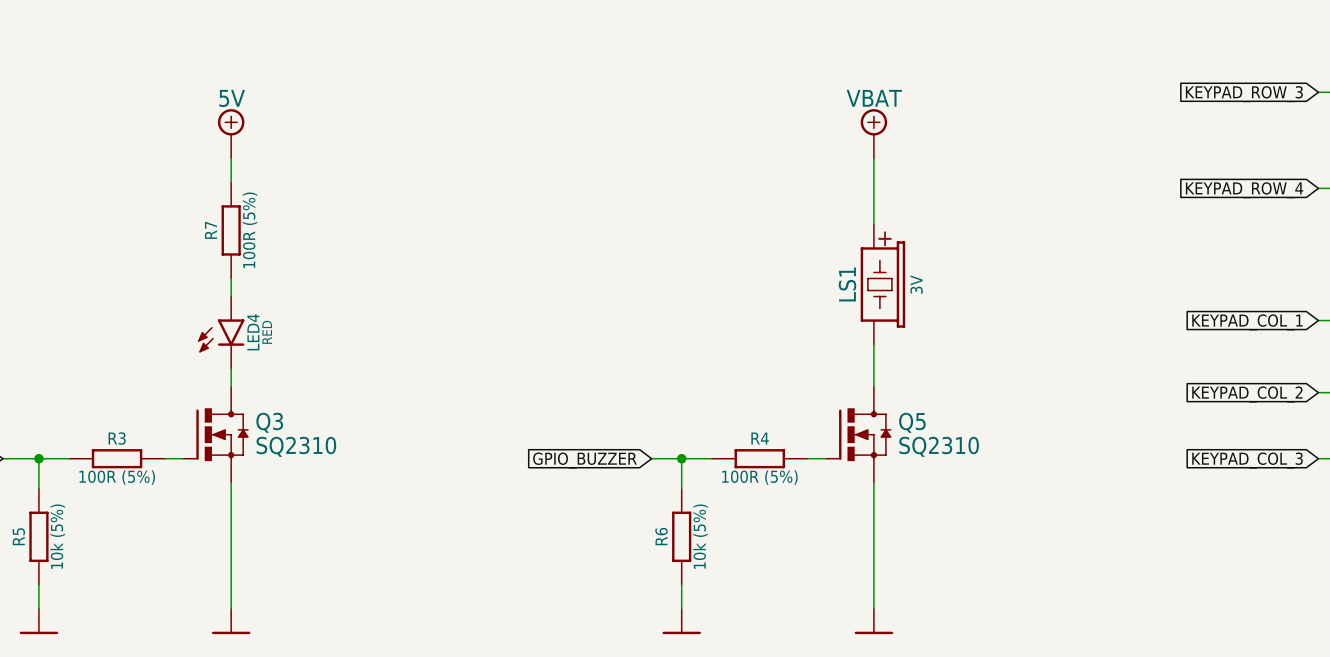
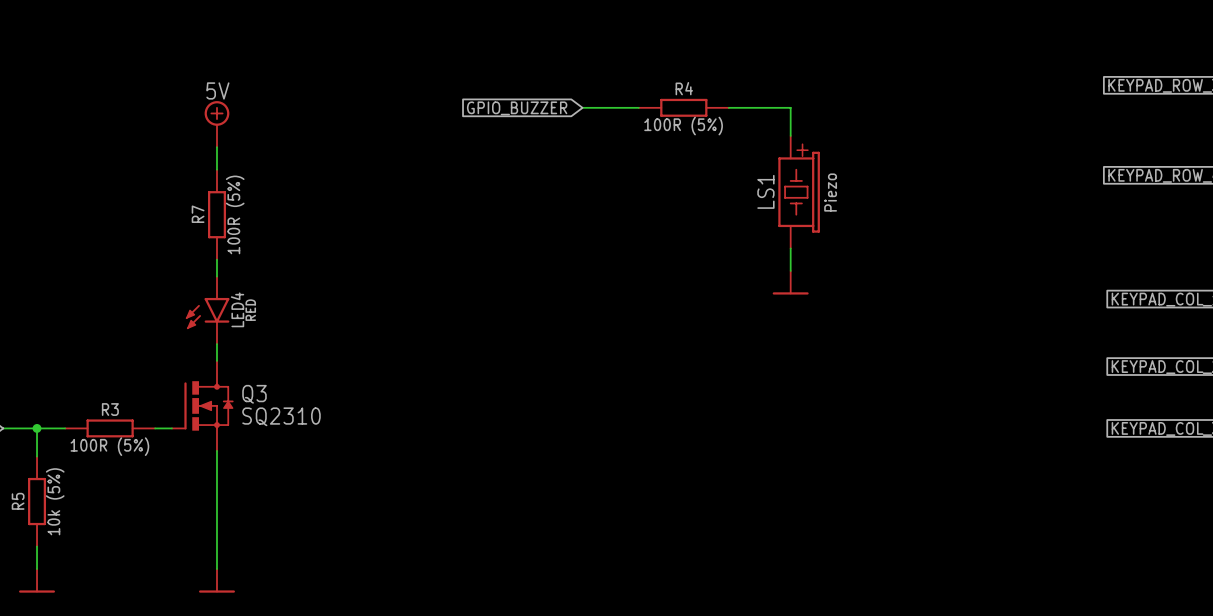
wire: none -> (582, 107) (638, 107)
wire: none -> (728, 107) (790, 107) (790, 135)
global label: none -> GPIO_BUZZER (517, 108)
power symbol: VBAT (873, 133) -> none
wire: none -> (790, 248) (790, 270)
LS1 position: (882, 284) -> (799, 192)
LS1 text: 3V (916, 284) -> Piezo (830, 192)
power symbol: none -> (790, 282)
wire: (873, 344) (873, 386) -> none
Q5: (858, 434) -> none
wire: (651, 458) (711, 458) -> none
wire: (681, 458) (681, 488) -> none
junction: (681, 458) -> none
R4 position: (759, 458) -> (683, 107)
wire: (807, 458) (825, 458) -> none
global label: GPIO_BUZZER (584, 460) -> none
wire: (873, 482) (873, 608) -> none
R6: 10k (5%) (681, 536) -> none
wire: (681, 584) (681, 608) -> none
power symbol: (681, 621) -> none
power symbol: (873, 621) -> none

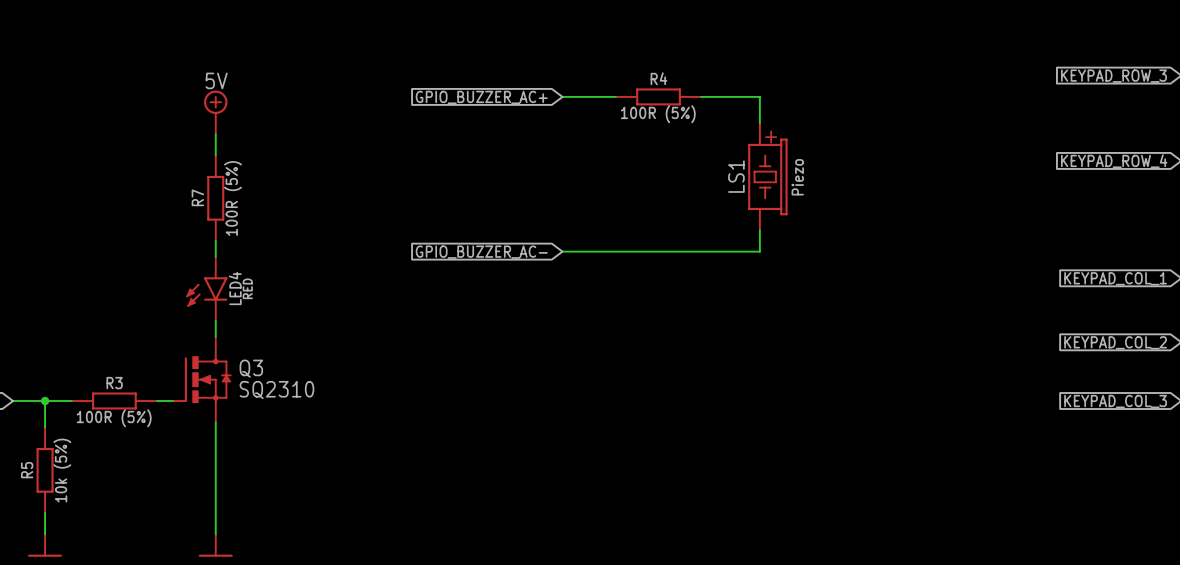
global label: GPIO_BUZZER (517, 108) -> GPIO_BUZZER_AC+ (481, 97)
wire: none -> (562, 251) (759, 251)
global label: none -> GPIO_BUZZER_AC- (481, 252)
power symbol: (790, 282) -> none

